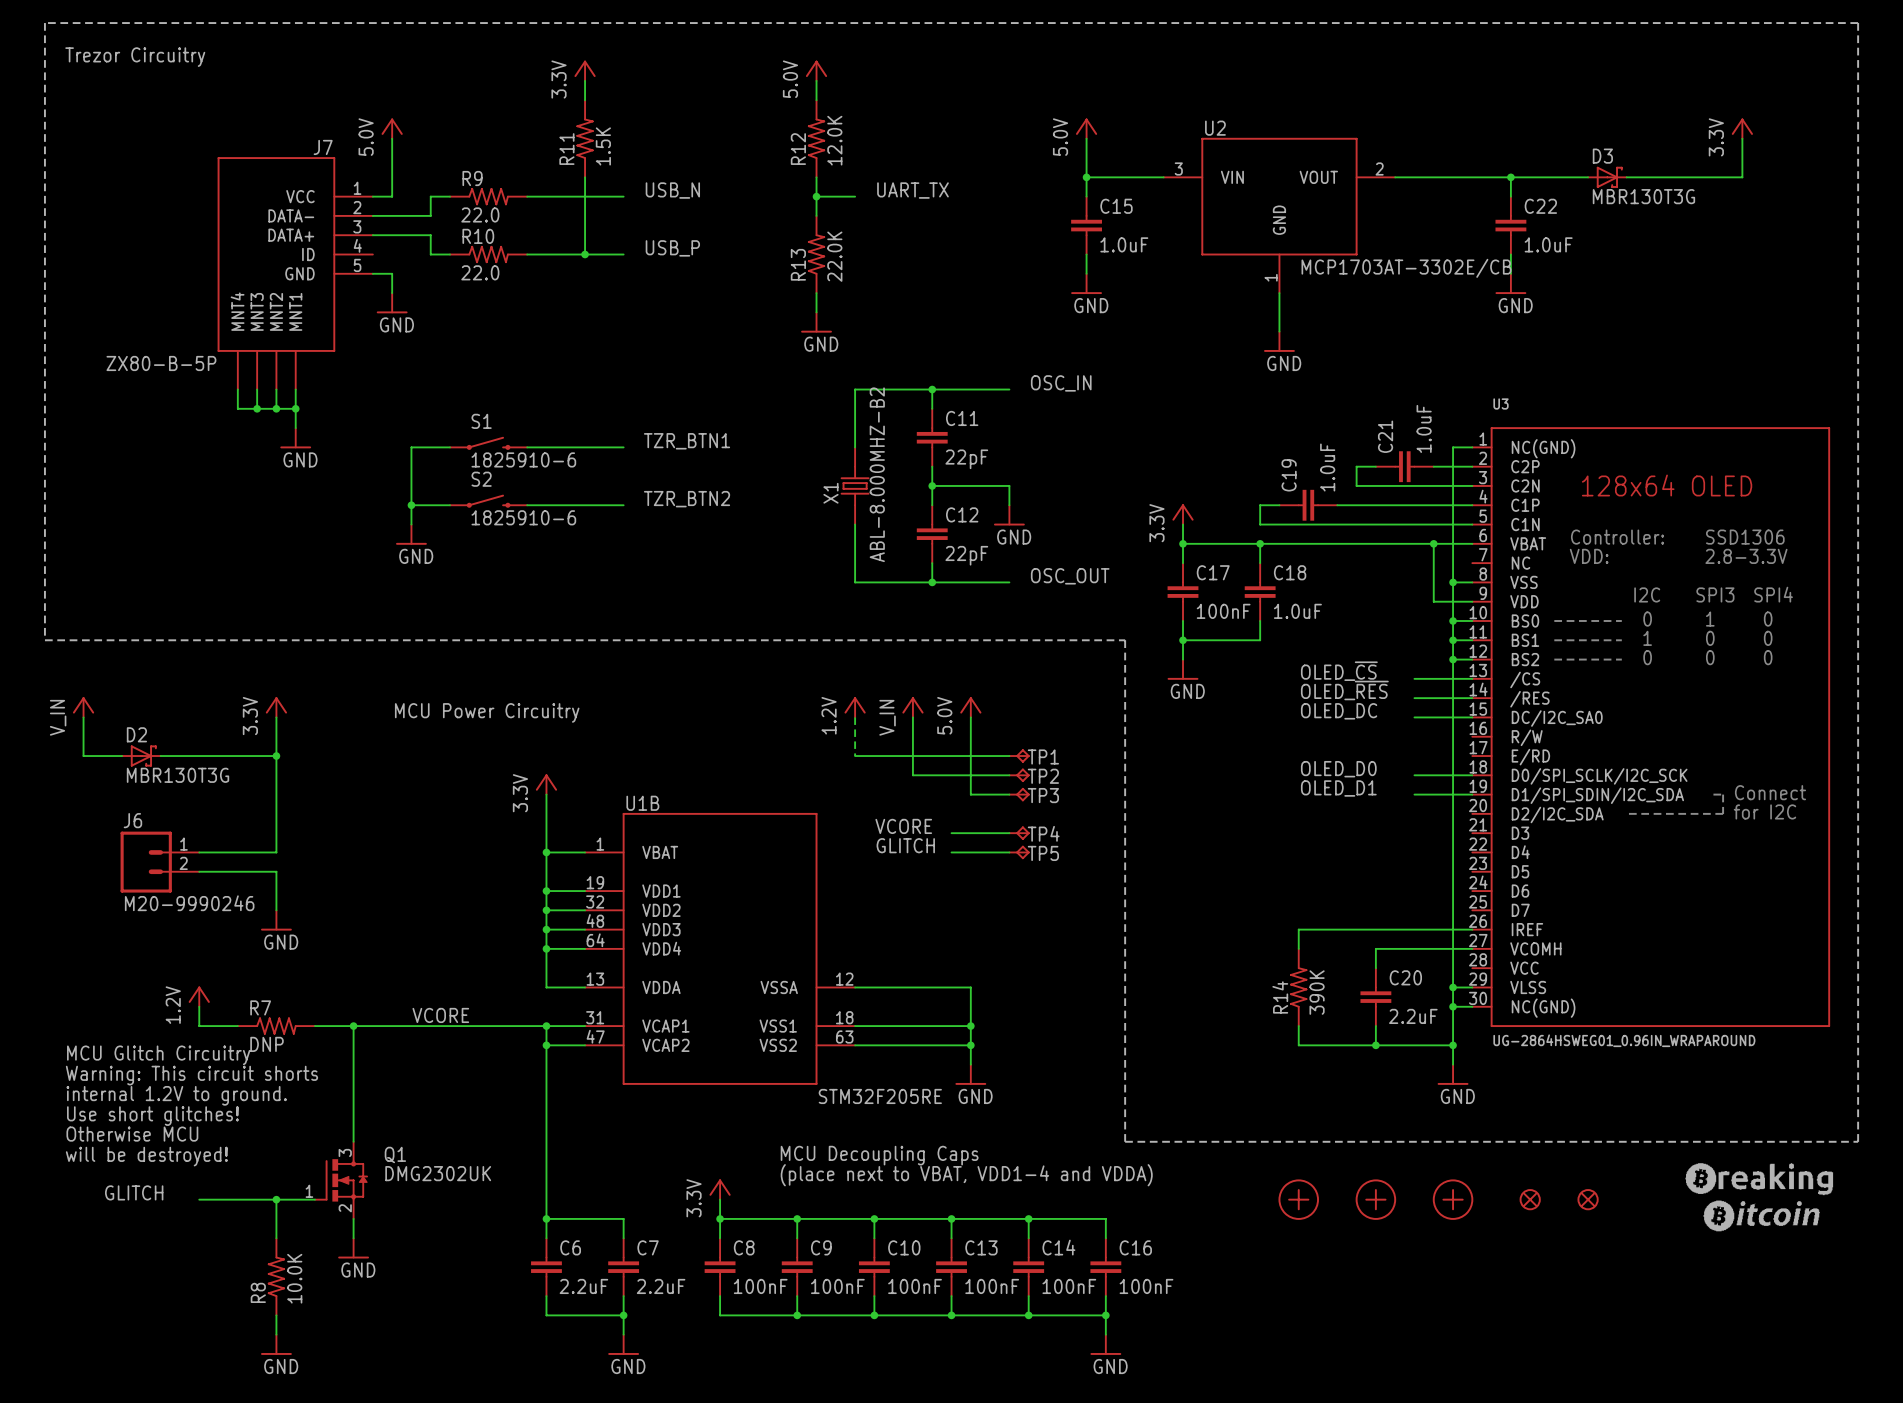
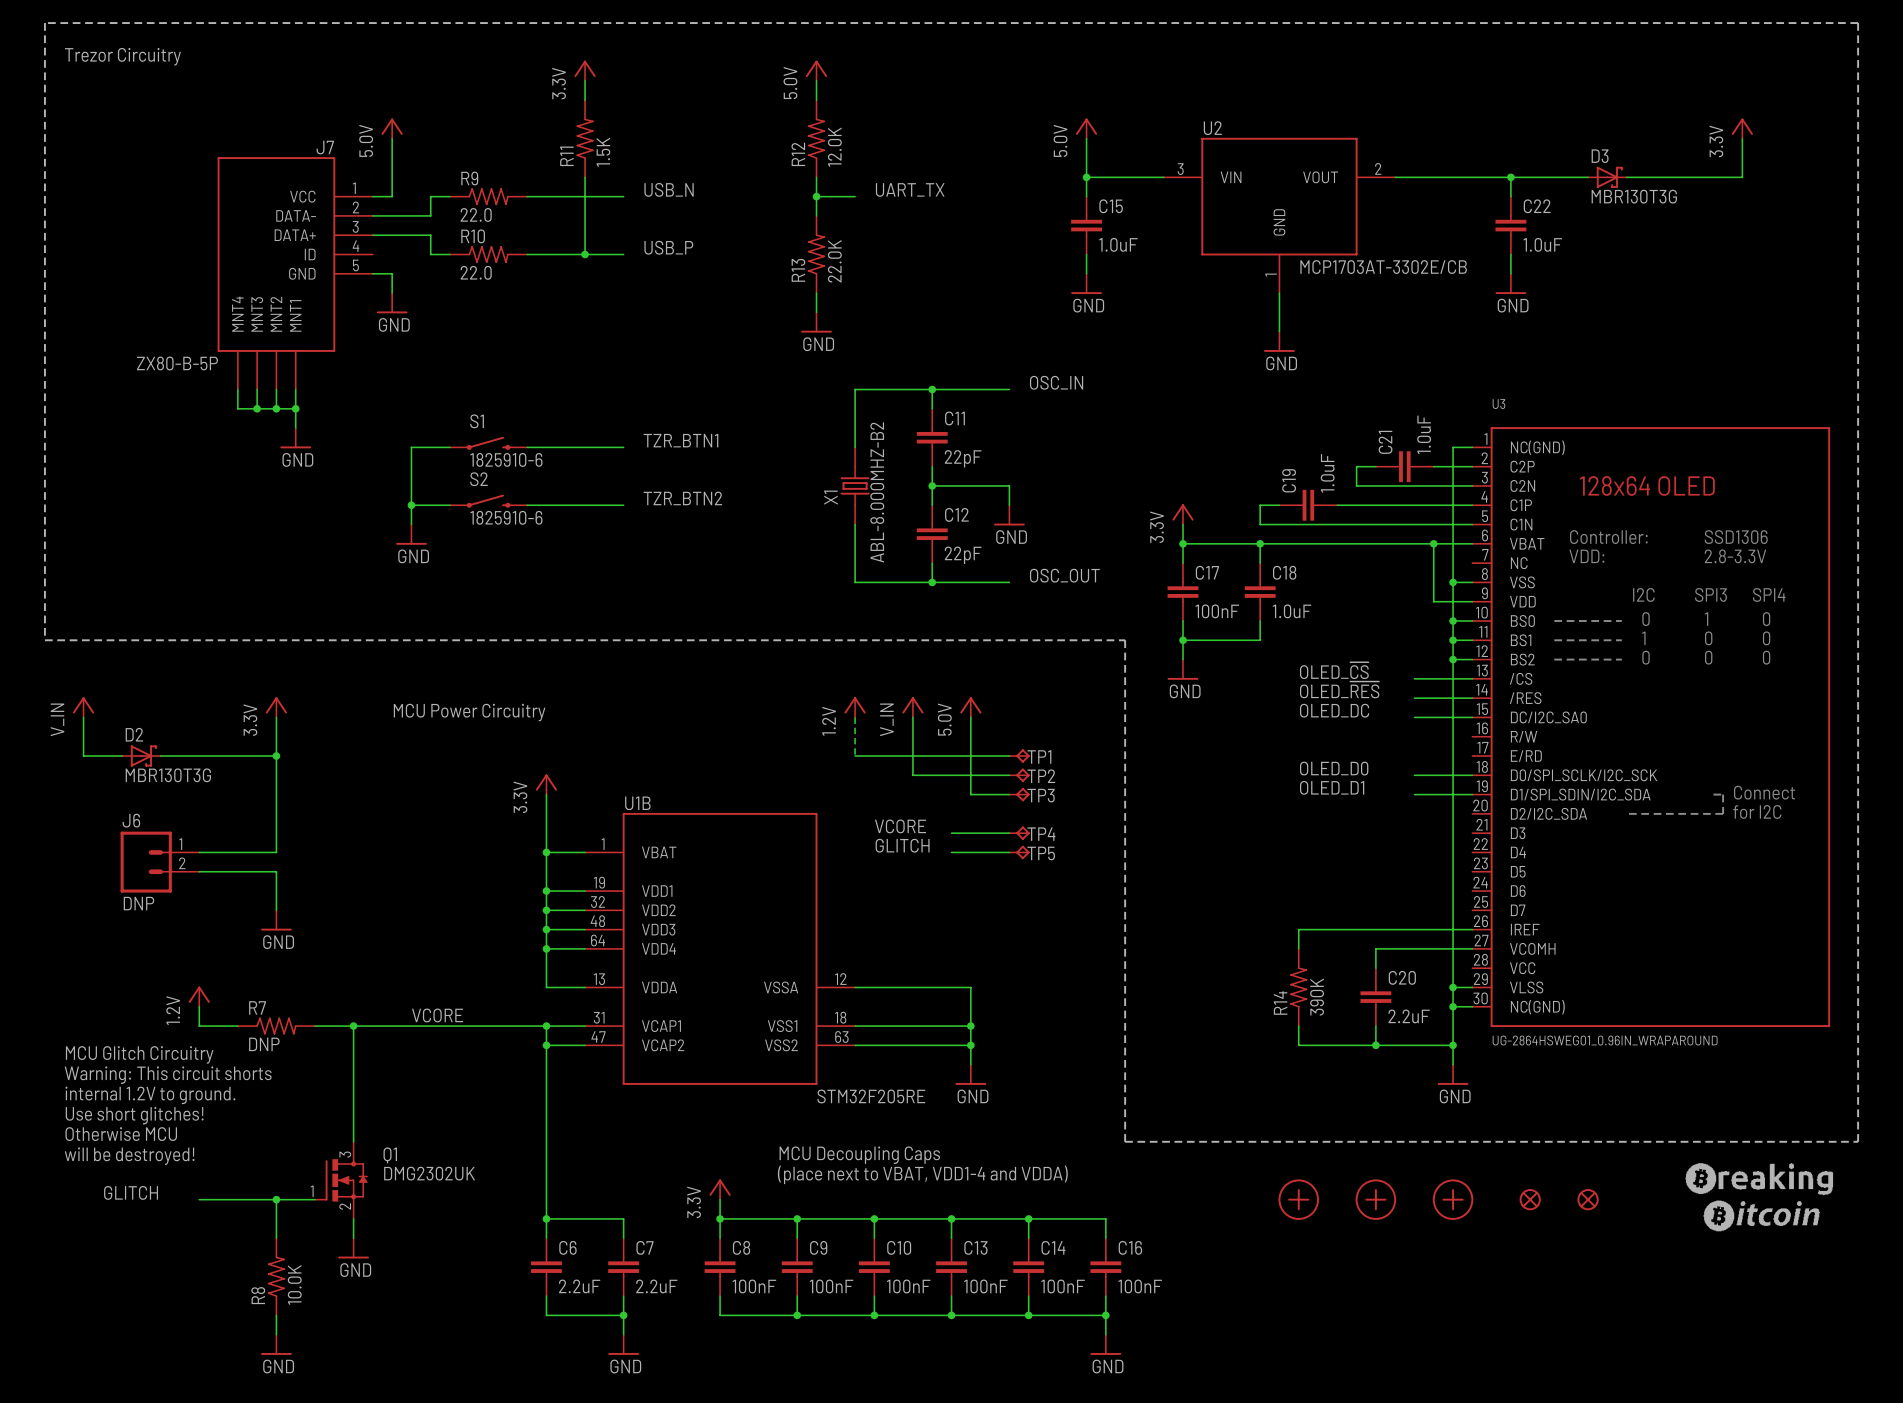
J6 value: M20-9990246 (189, 903) -> DNP (138, 903)

